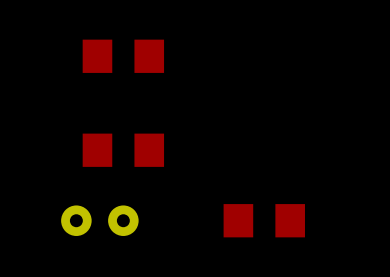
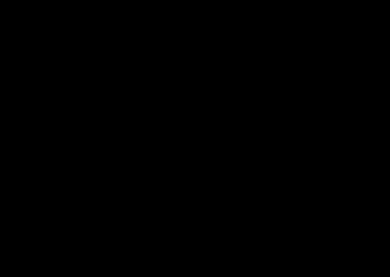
part: (123, 56) -> none
part: (123, 150) -> none
part: (99, 220) -> none
part: (264, 220) -> none

